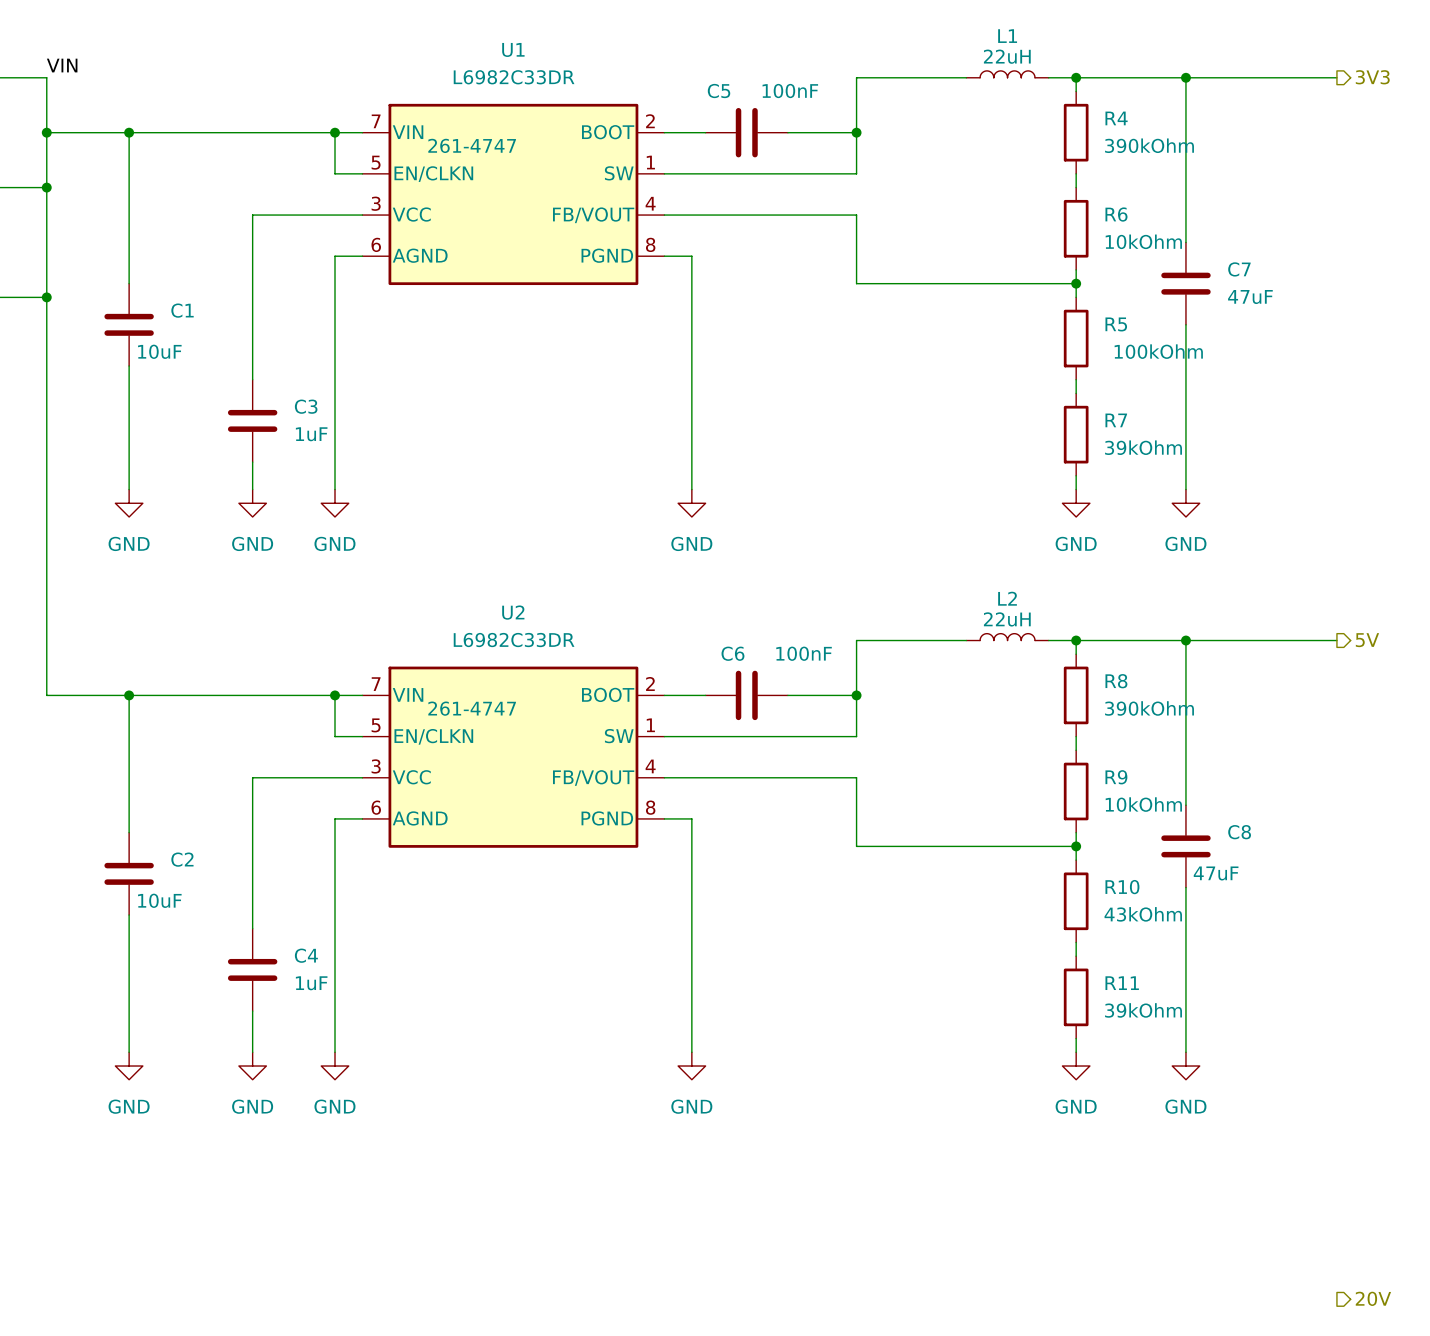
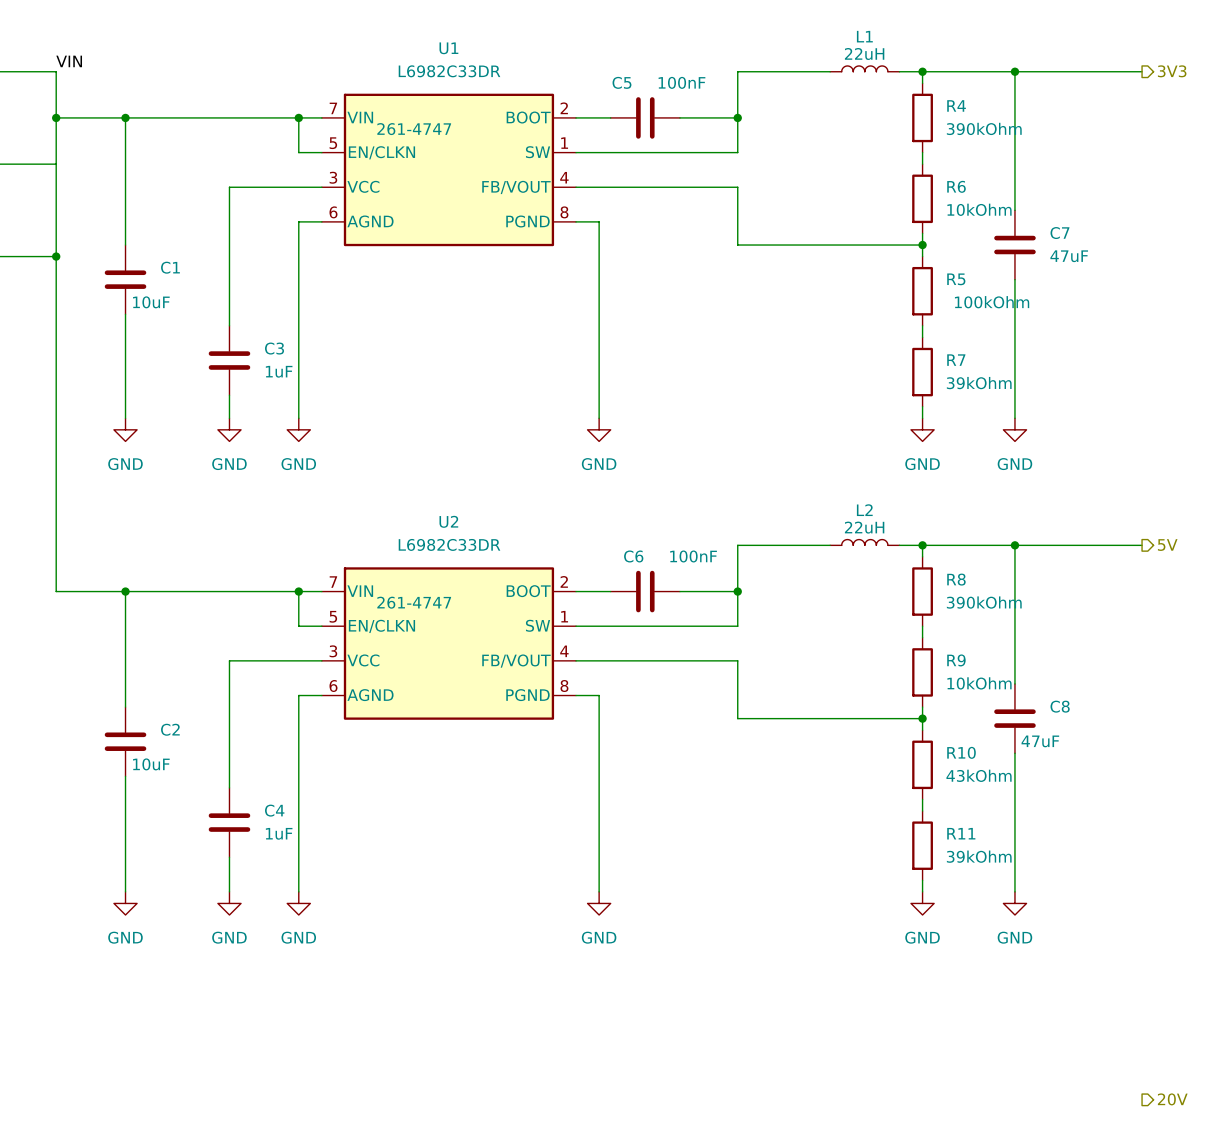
junction: (46, 187) -> none

